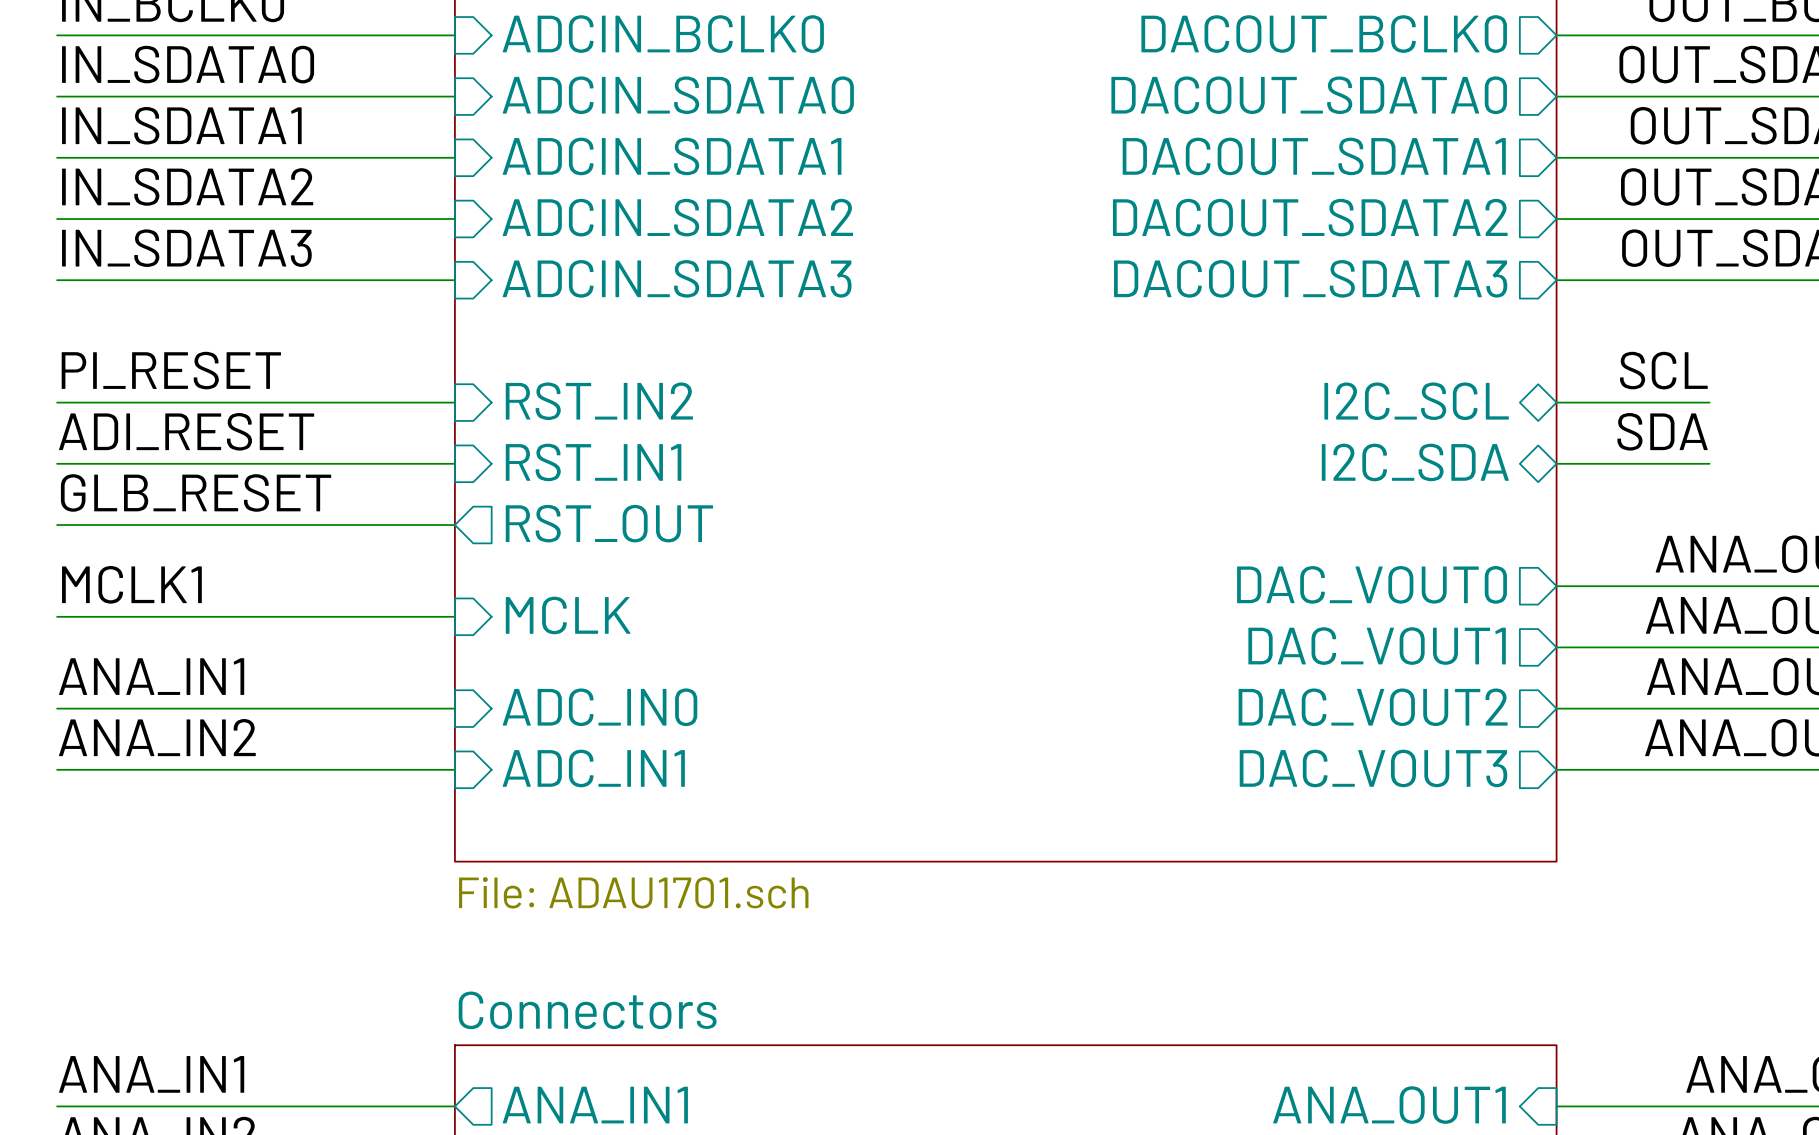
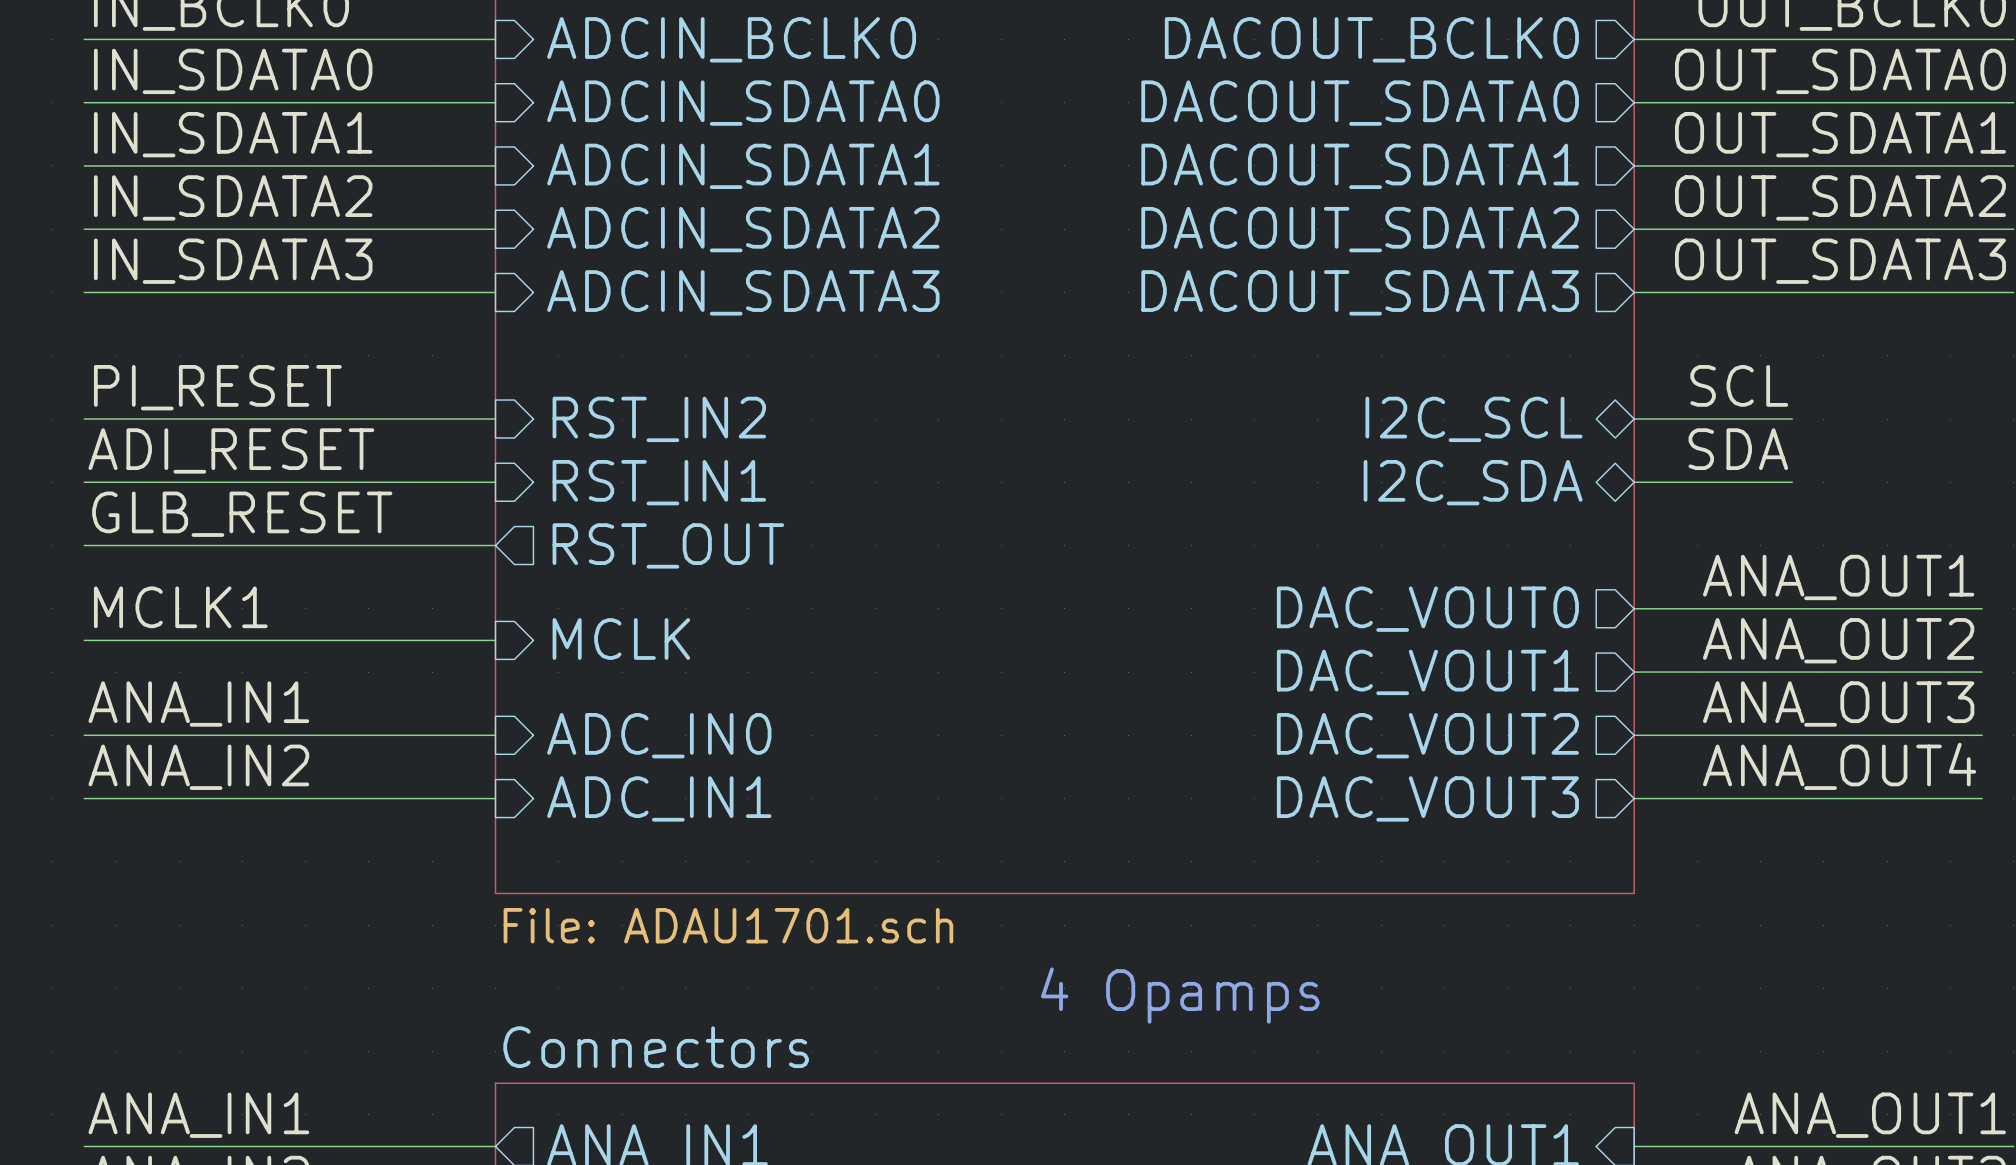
text: none -> 4 Opamps (1180, 995)

